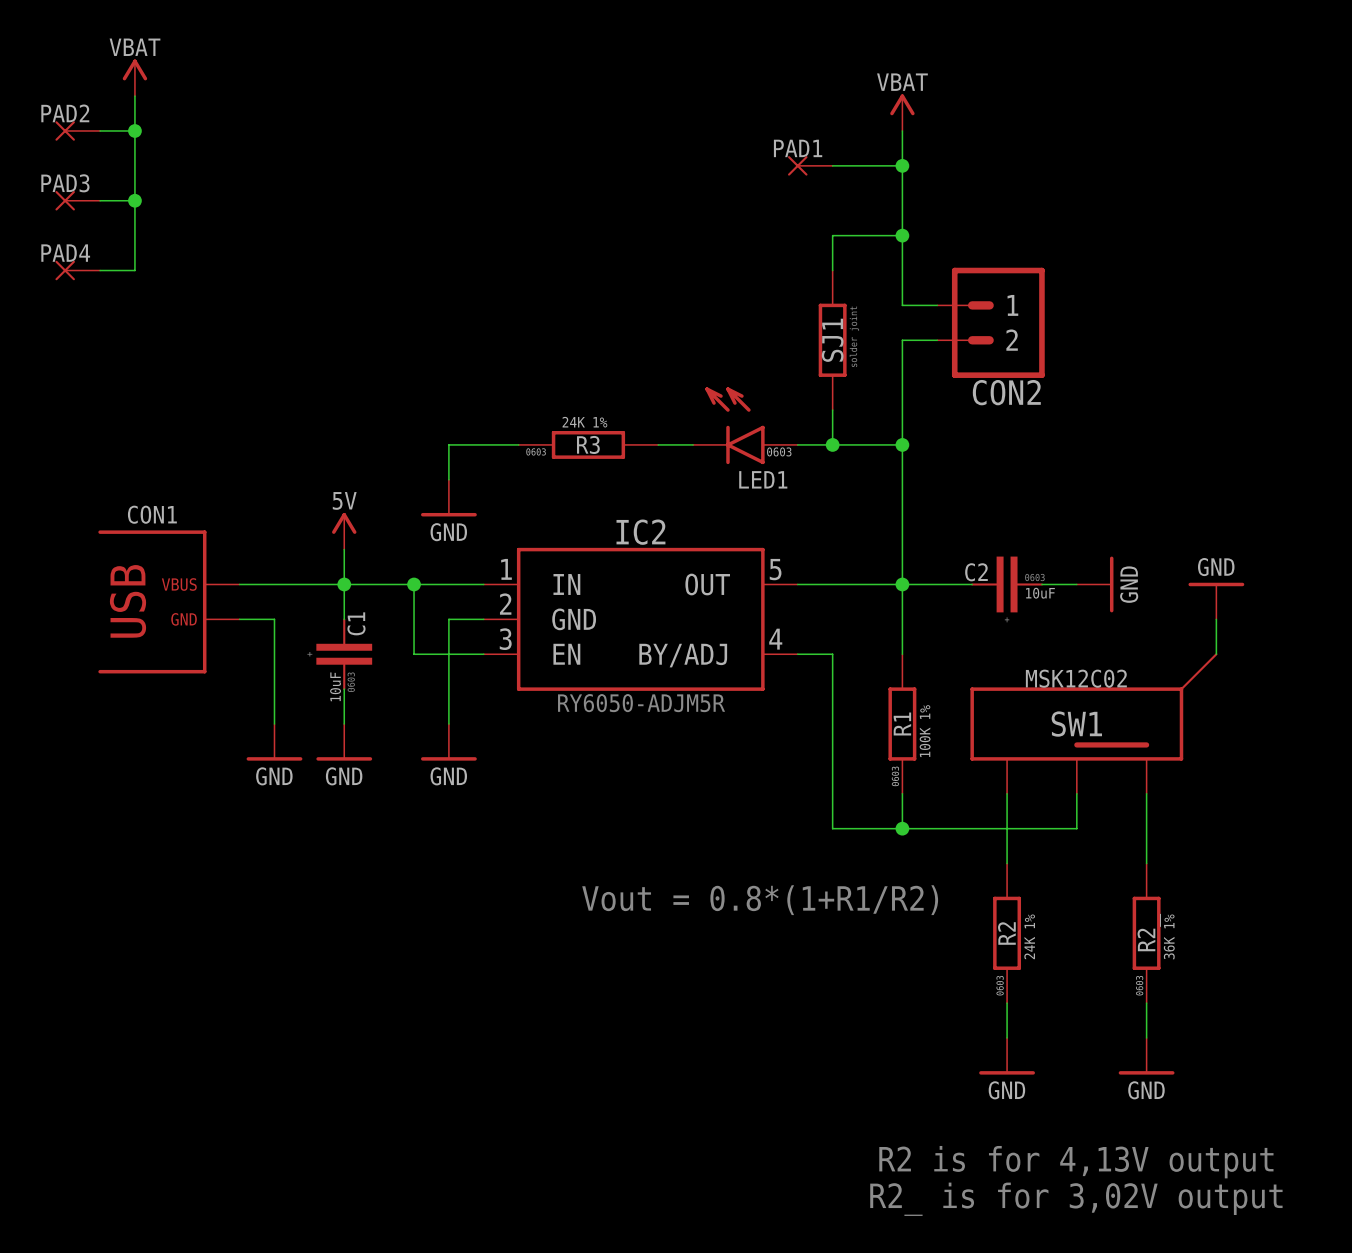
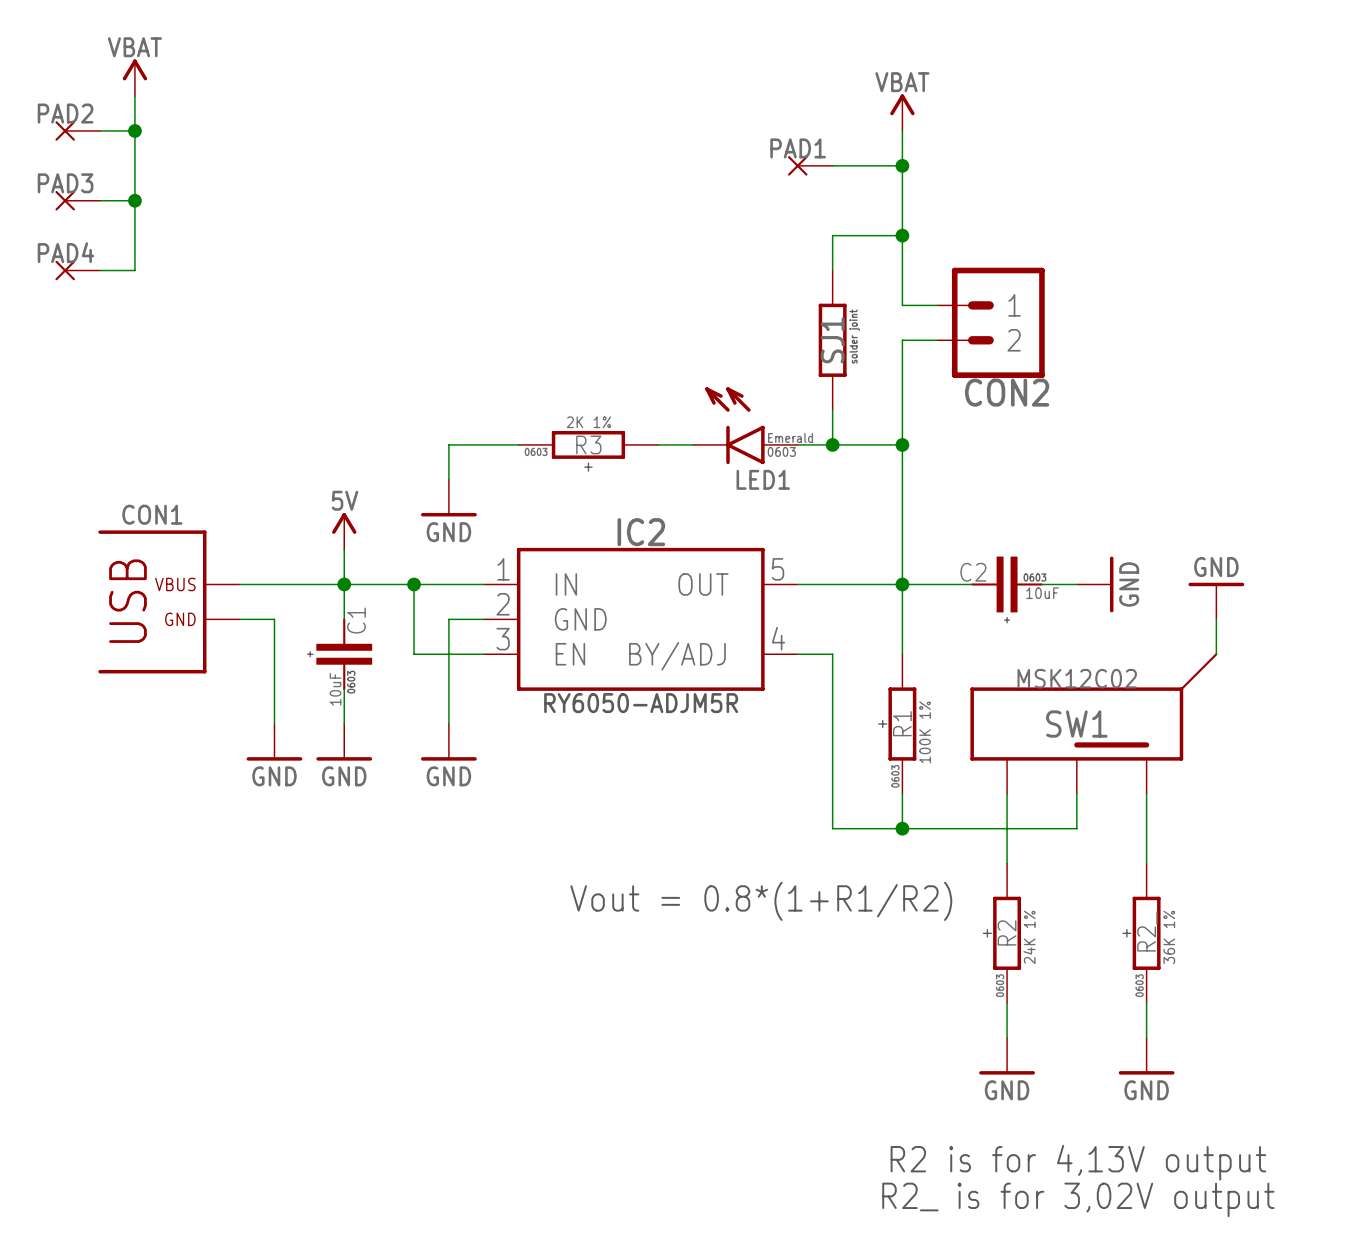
R3 value: 24K (573, 422) -> 2K (574, 422)
LED1 text: none -> Emerald (790, 437)
R3 text: none -> + (588, 467)
R1 text: none -> + (882, 724)
R2 text: none -> + (987, 933)
R2_ text: none -> + (1126, 933)

